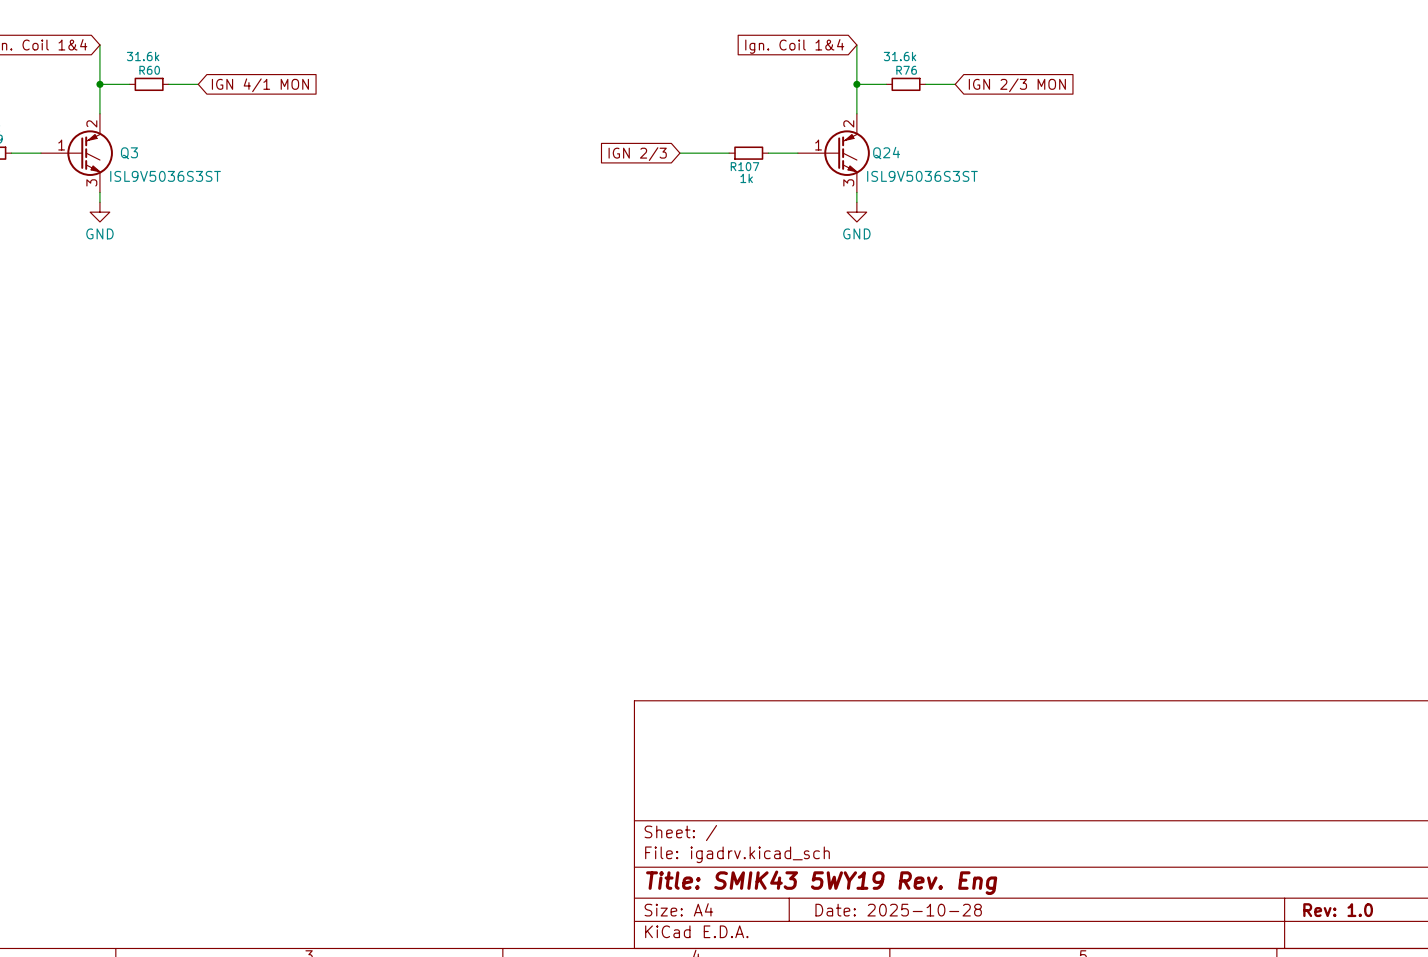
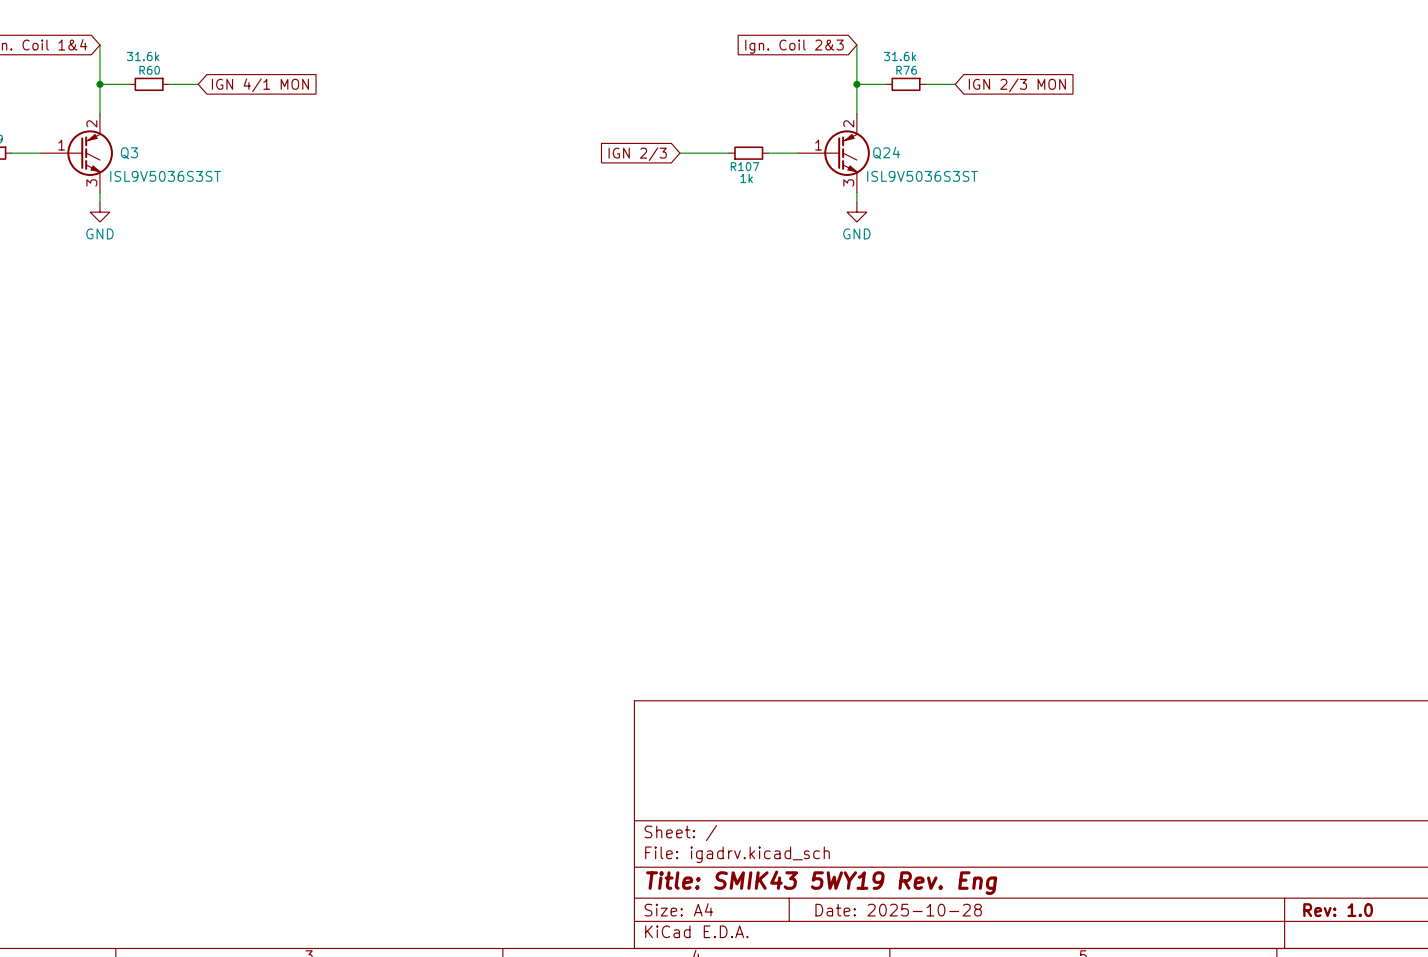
global label: Ign. Coil 1&4 (794, 46) -> Ign. Coil 2&3 (794, 46)

